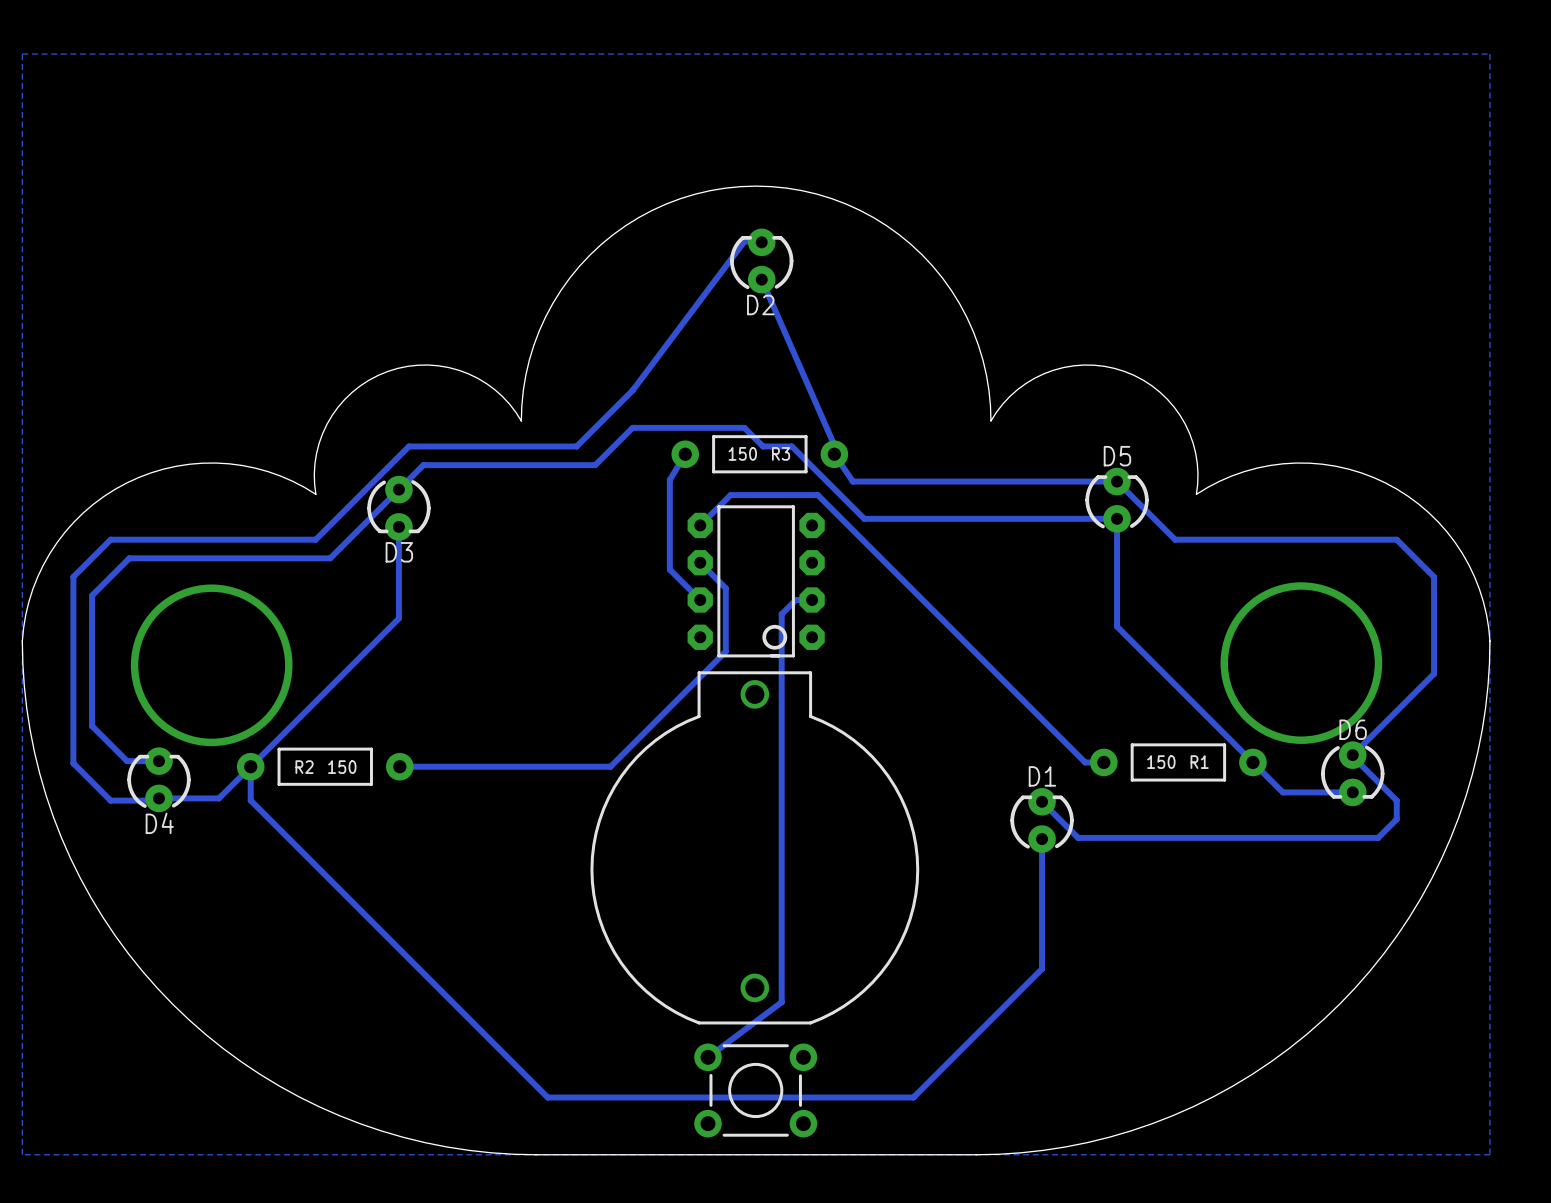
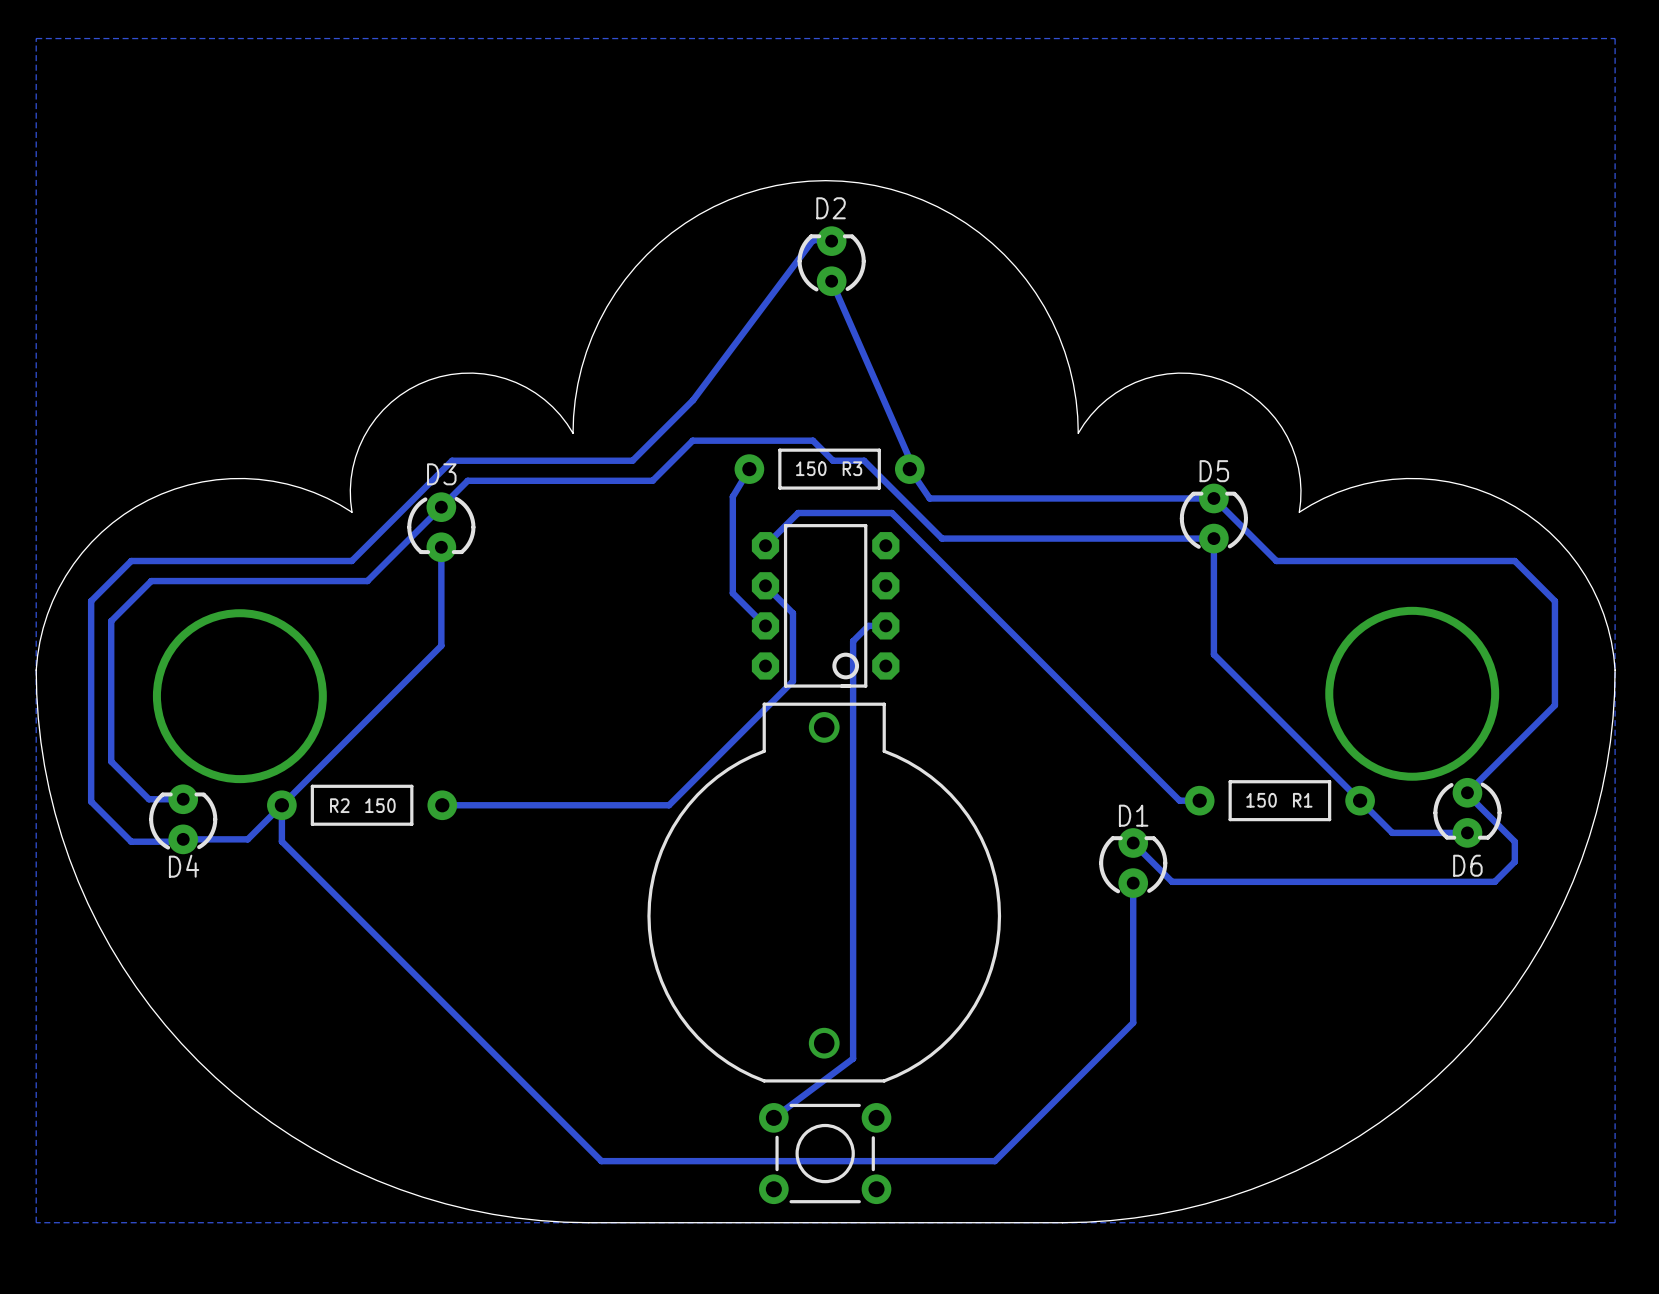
D2 name position: D2 (760, 305) -> D2 (831, 208)
D3 name position: D3 (399, 552) -> D3 (441, 474)
D6 name position: D6 (1353, 729) -> D6 (1467, 865)

